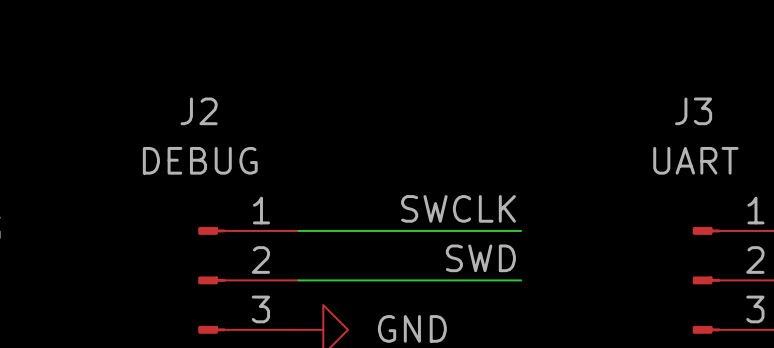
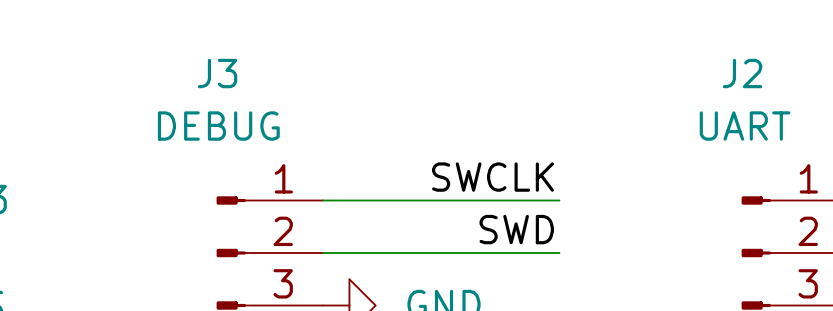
J2 name: J2 (199, 111) -> J3 (217, 73)
J3 name: J3 (693, 111) -> J2 (742, 73)

